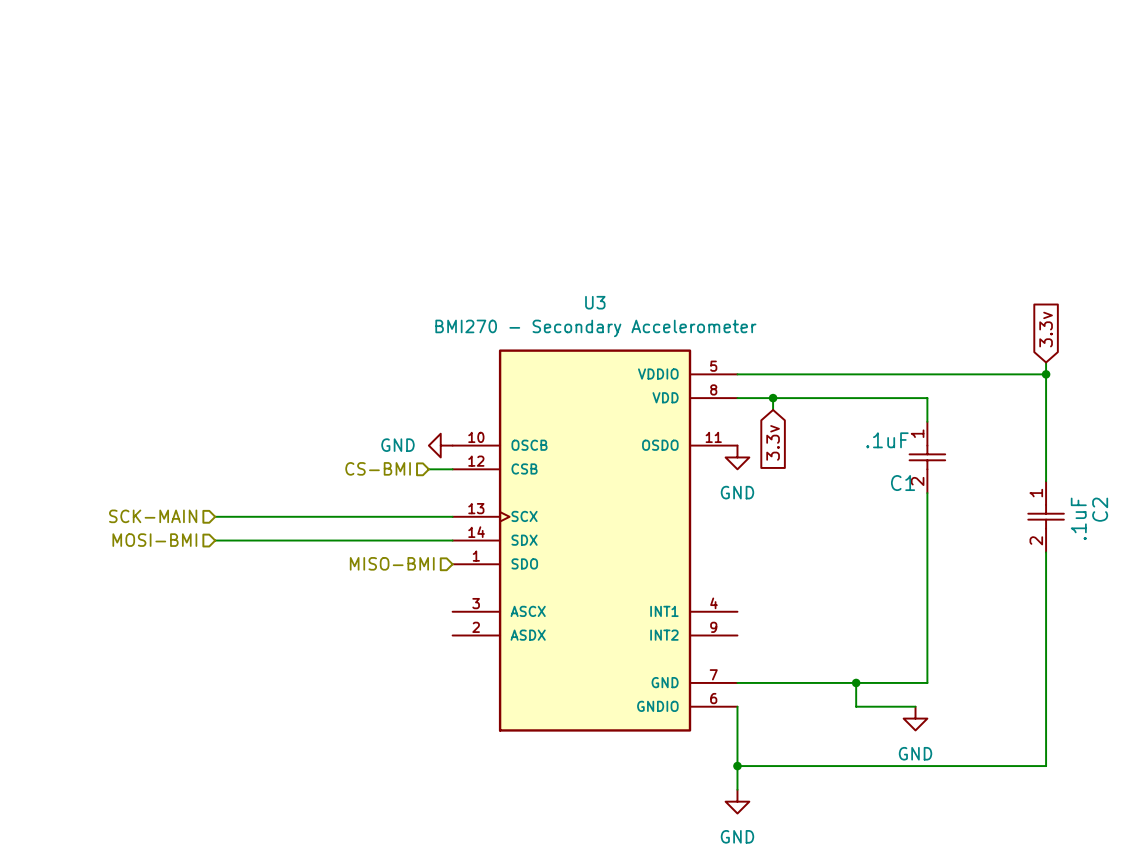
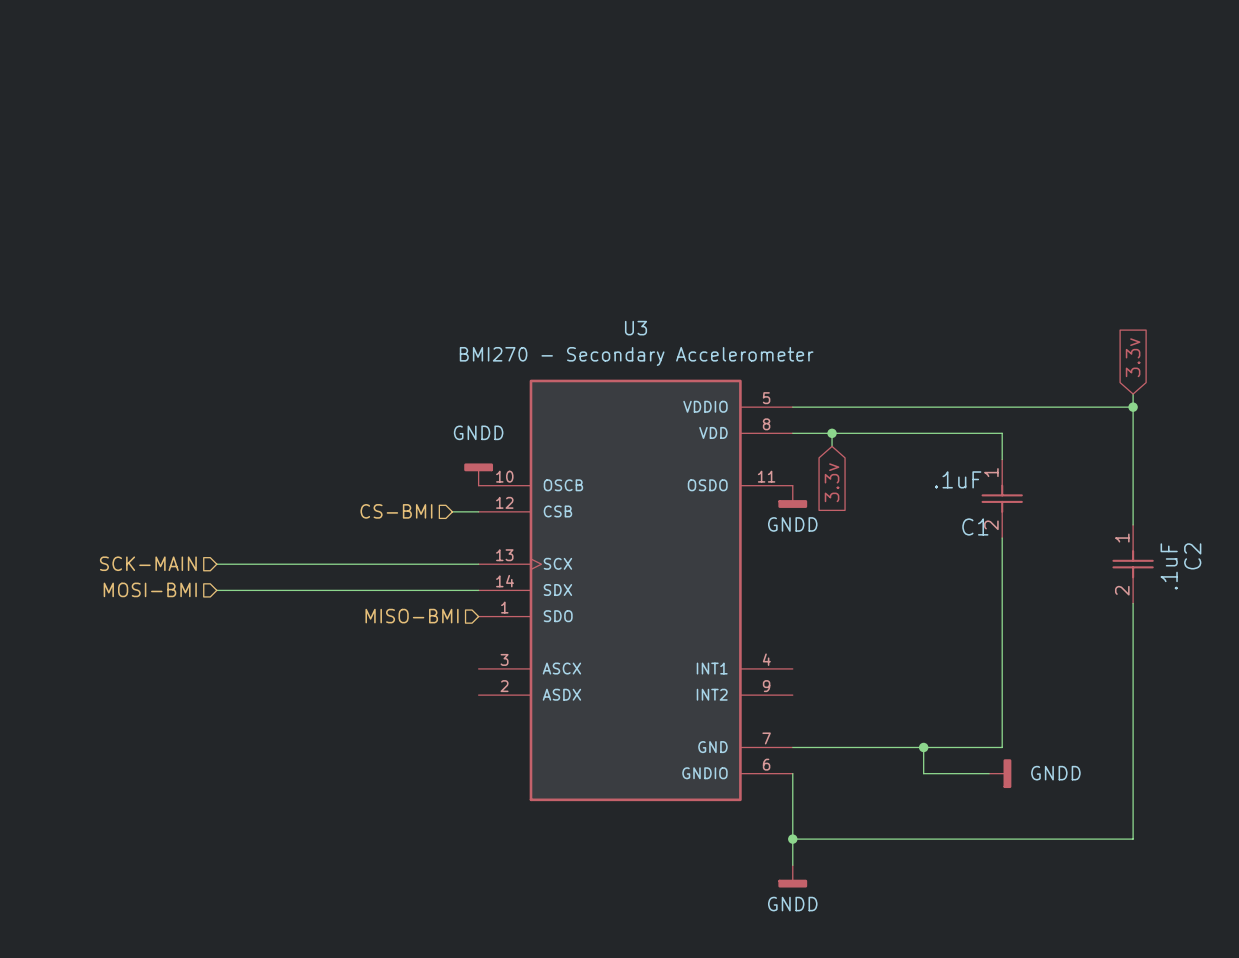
power symbol: none -> GNDD (478, 474)
power symbol: GND (440, 445) -> none
power symbol: GND (737, 457) -> GNDD (792, 496)
power symbol: none -> GNDD (1000, 773)
power symbol: GND (915, 718) -> none
power symbol: GND (737, 801) -> GNDD (792, 876)

